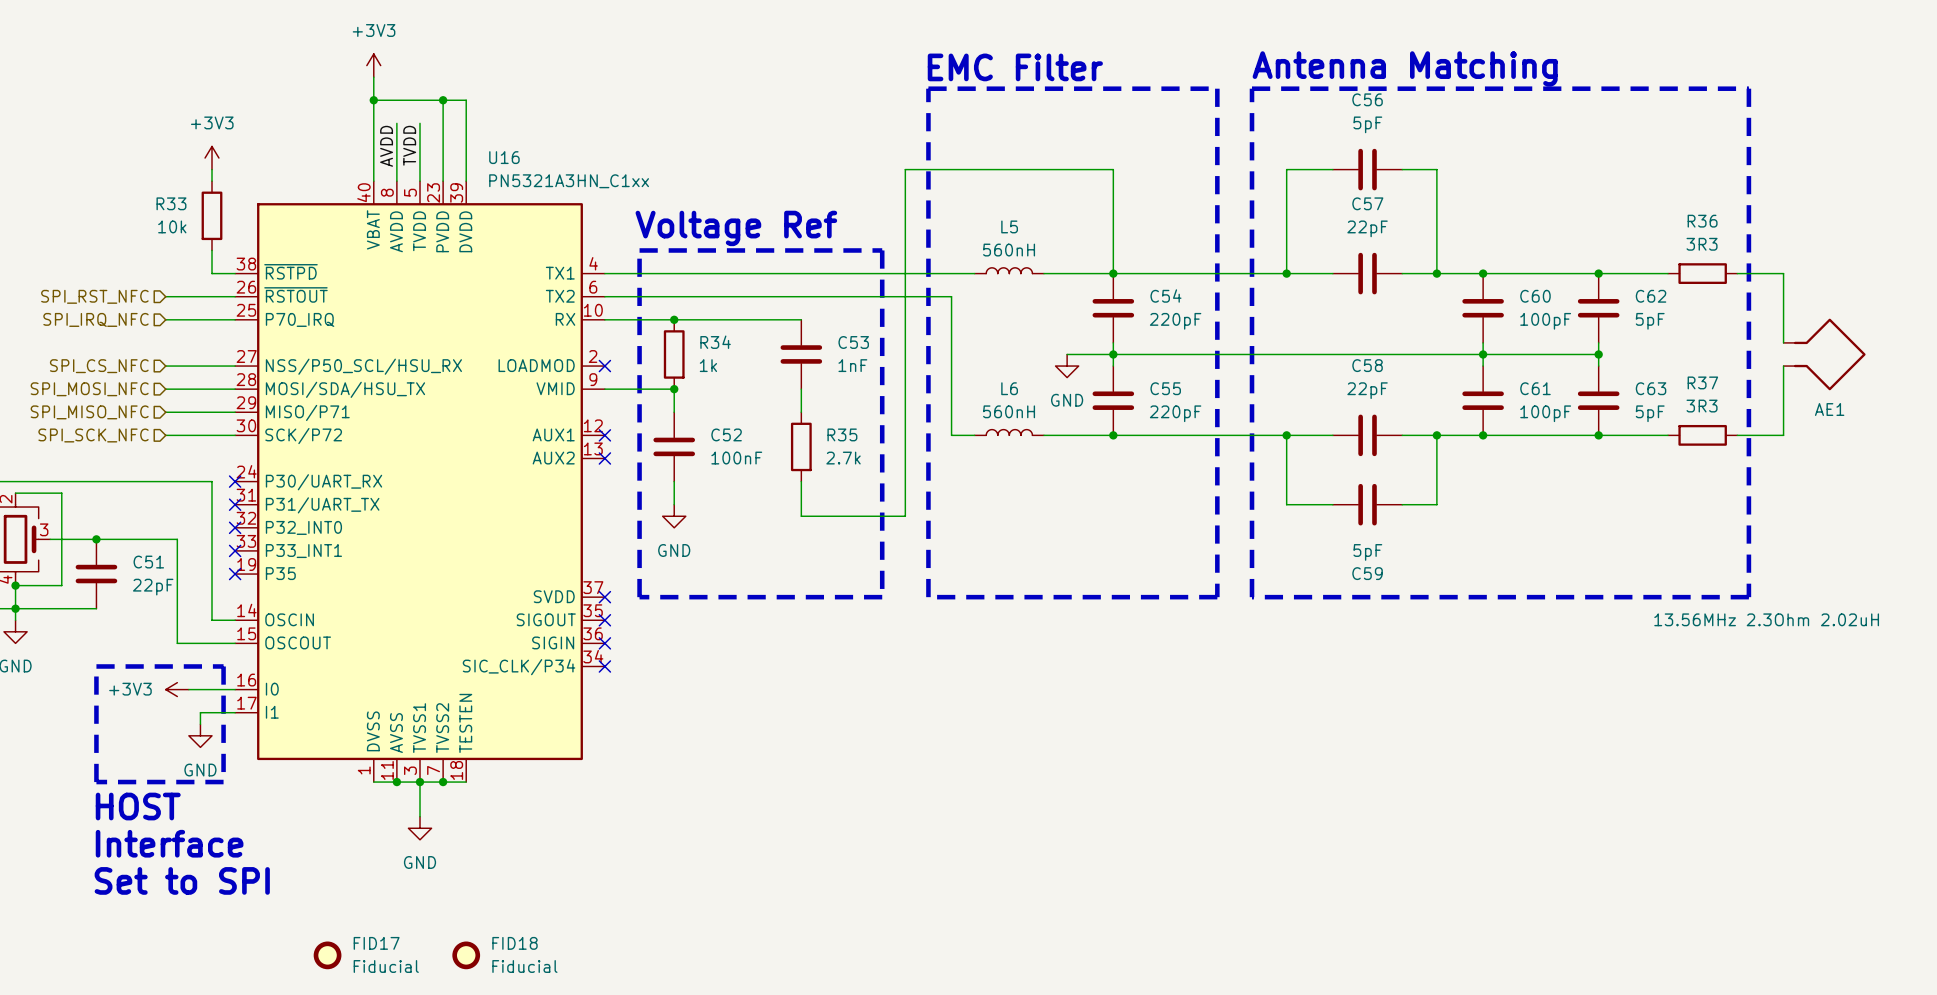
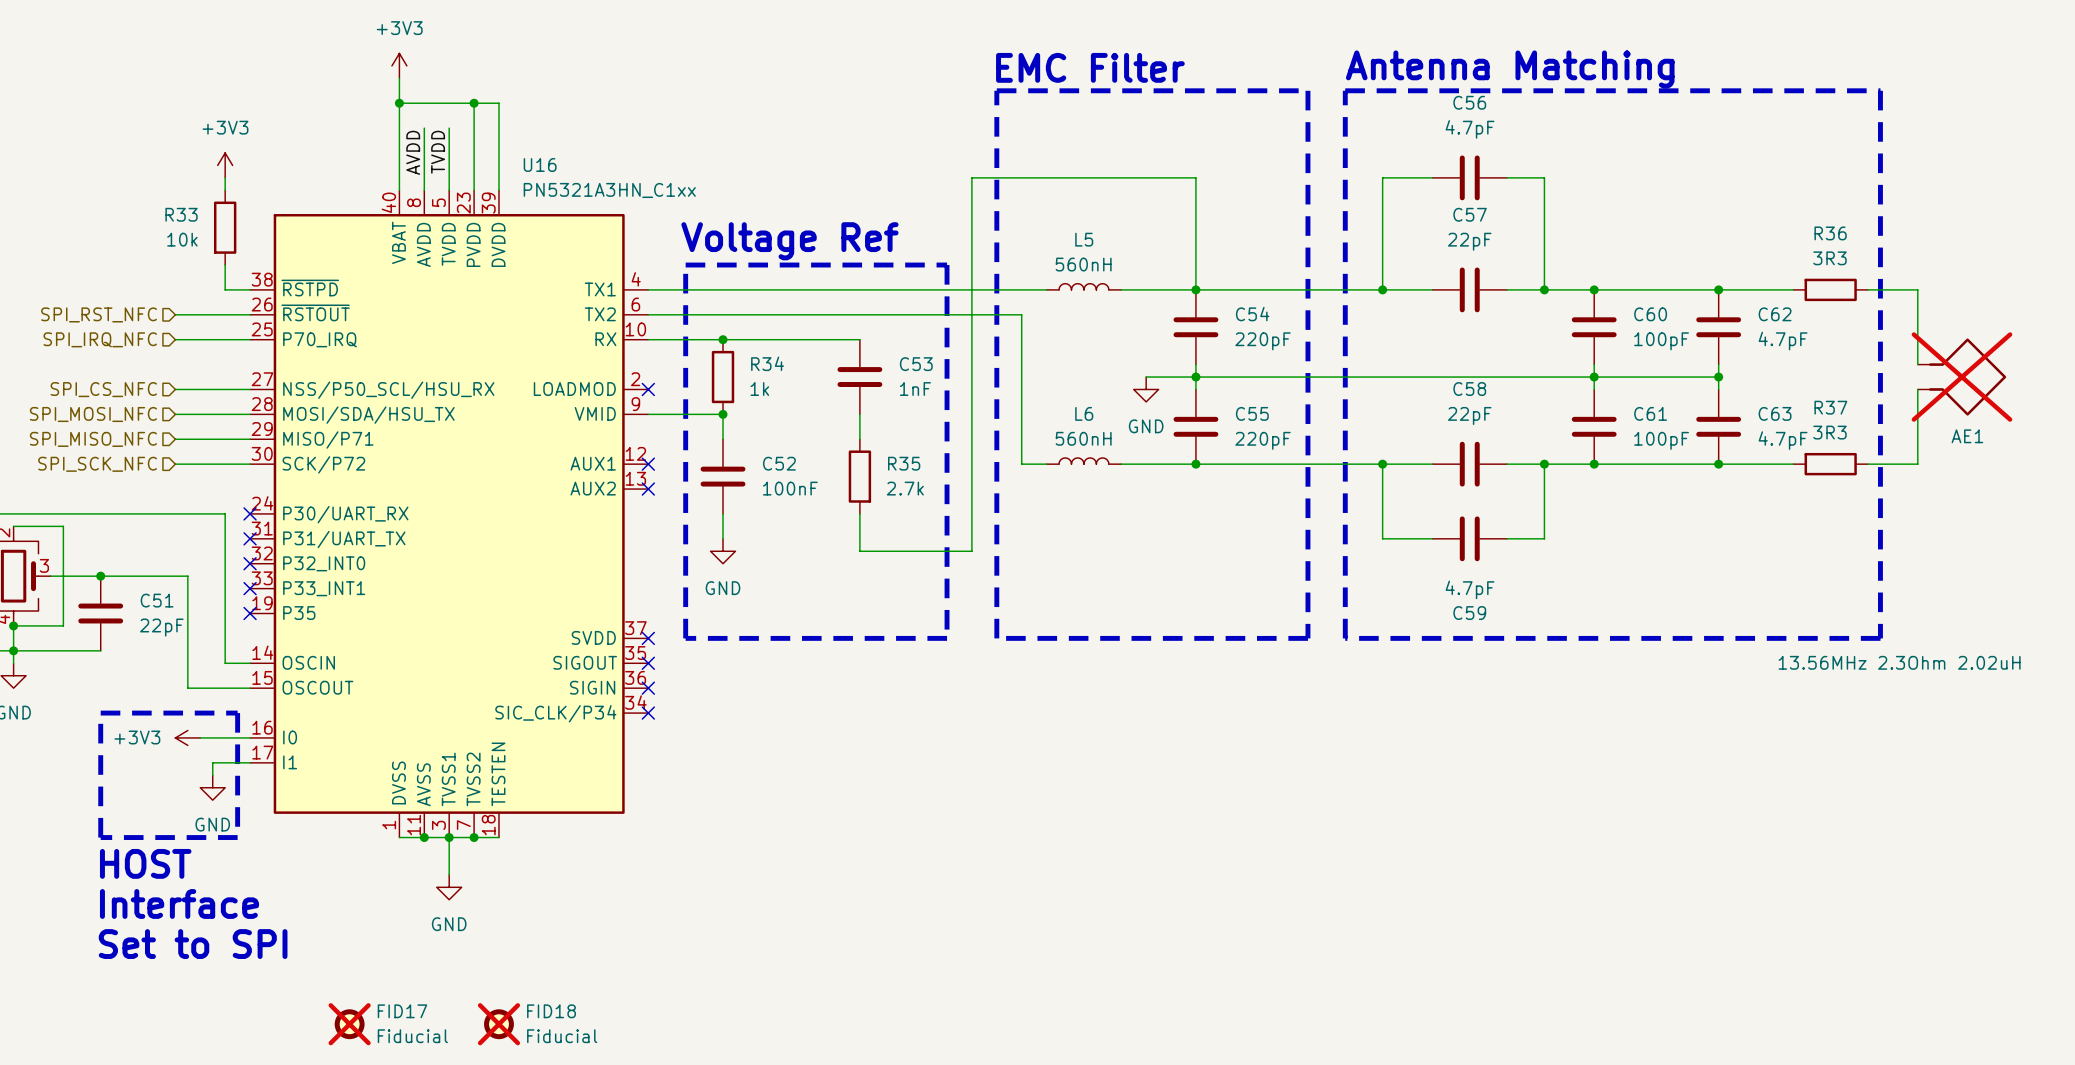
C56 value: 5pF (1367, 124) -> 4.7pF (1470, 129)
C62 value: 5pF (1650, 321) -> 4.7pF (1783, 341)
AE1 do-not-place cross: none -> (1961, 377)
C63 value: 5pF (1650, 413) -> 4.7pF (1783, 440)
C59 value: 5pF (1367, 552) -> 4.7pF (1470, 589)
FID17 do-not-place cross: none -> (349, 1024)
FID18 do-not-place cross: none -> (498, 1024)

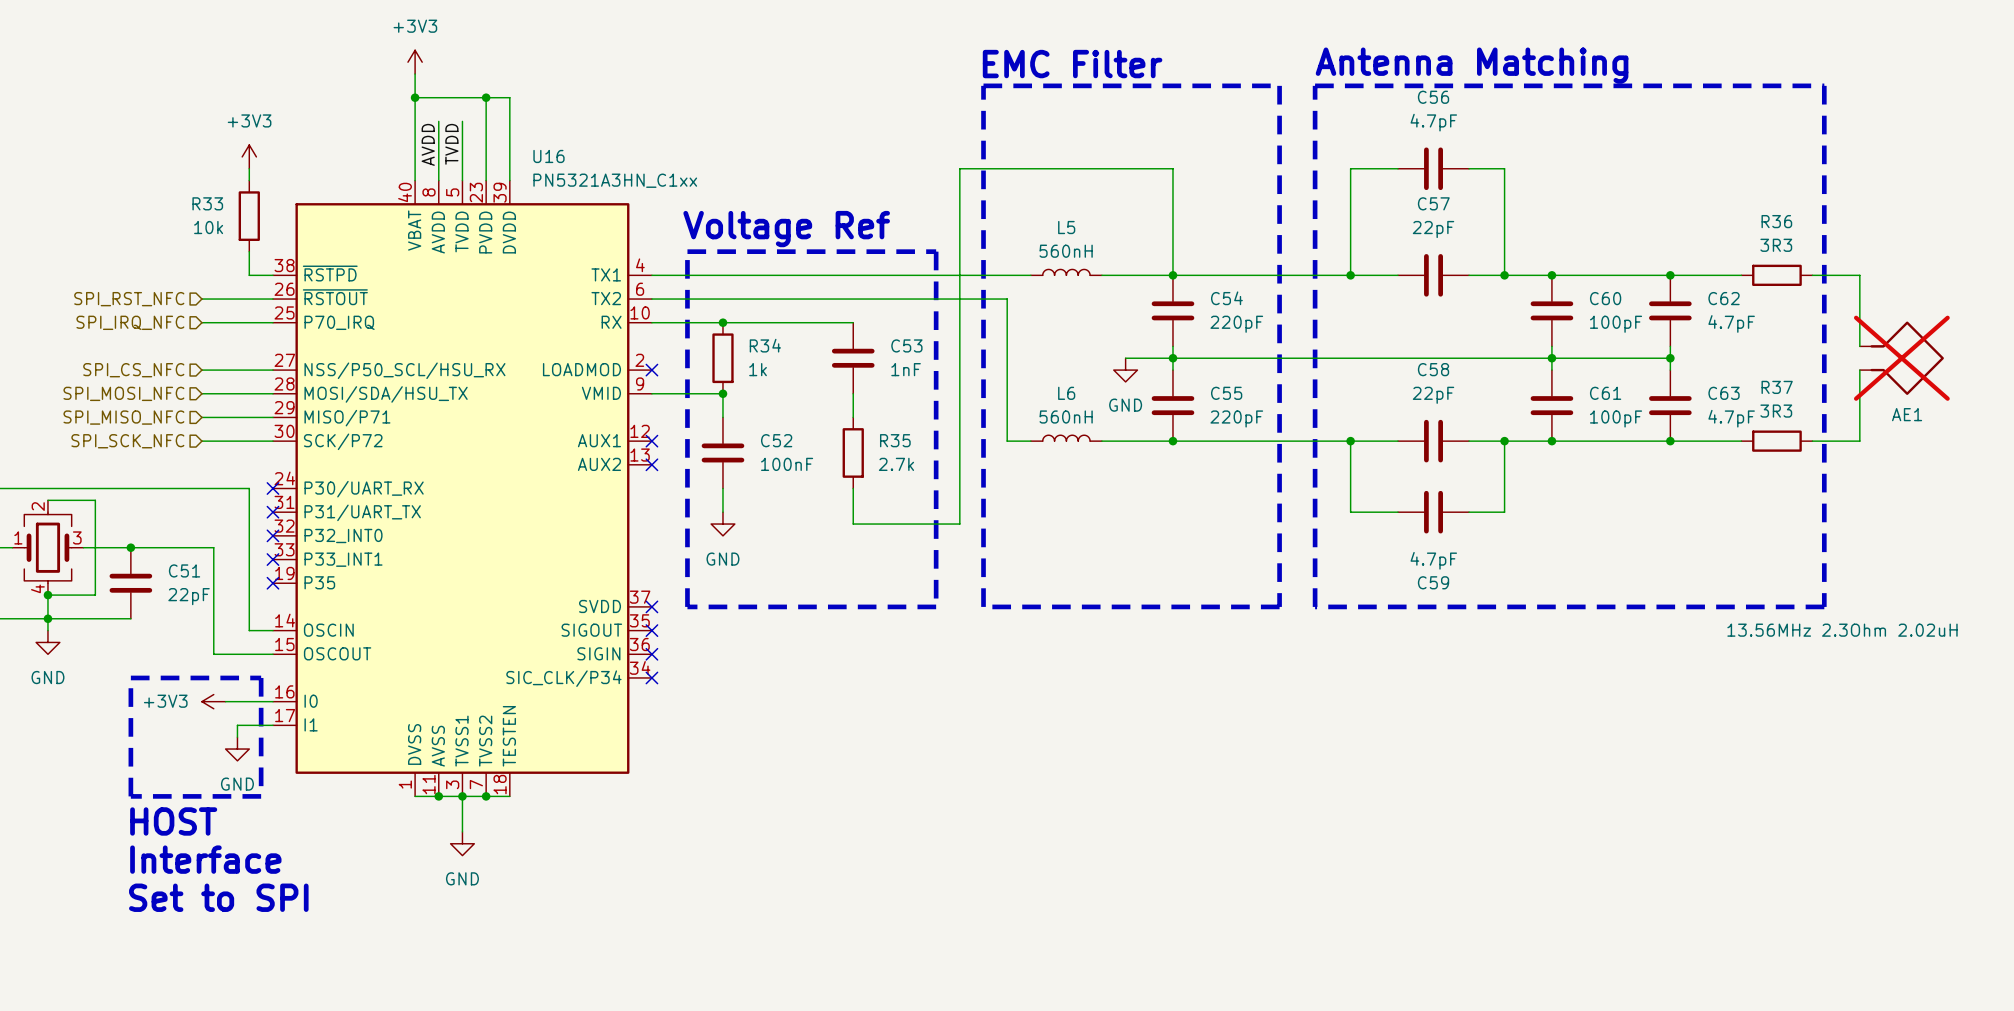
FID17: Fiducial (349, 1024) -> none
FID18: Fiducial (498, 1024) -> none

